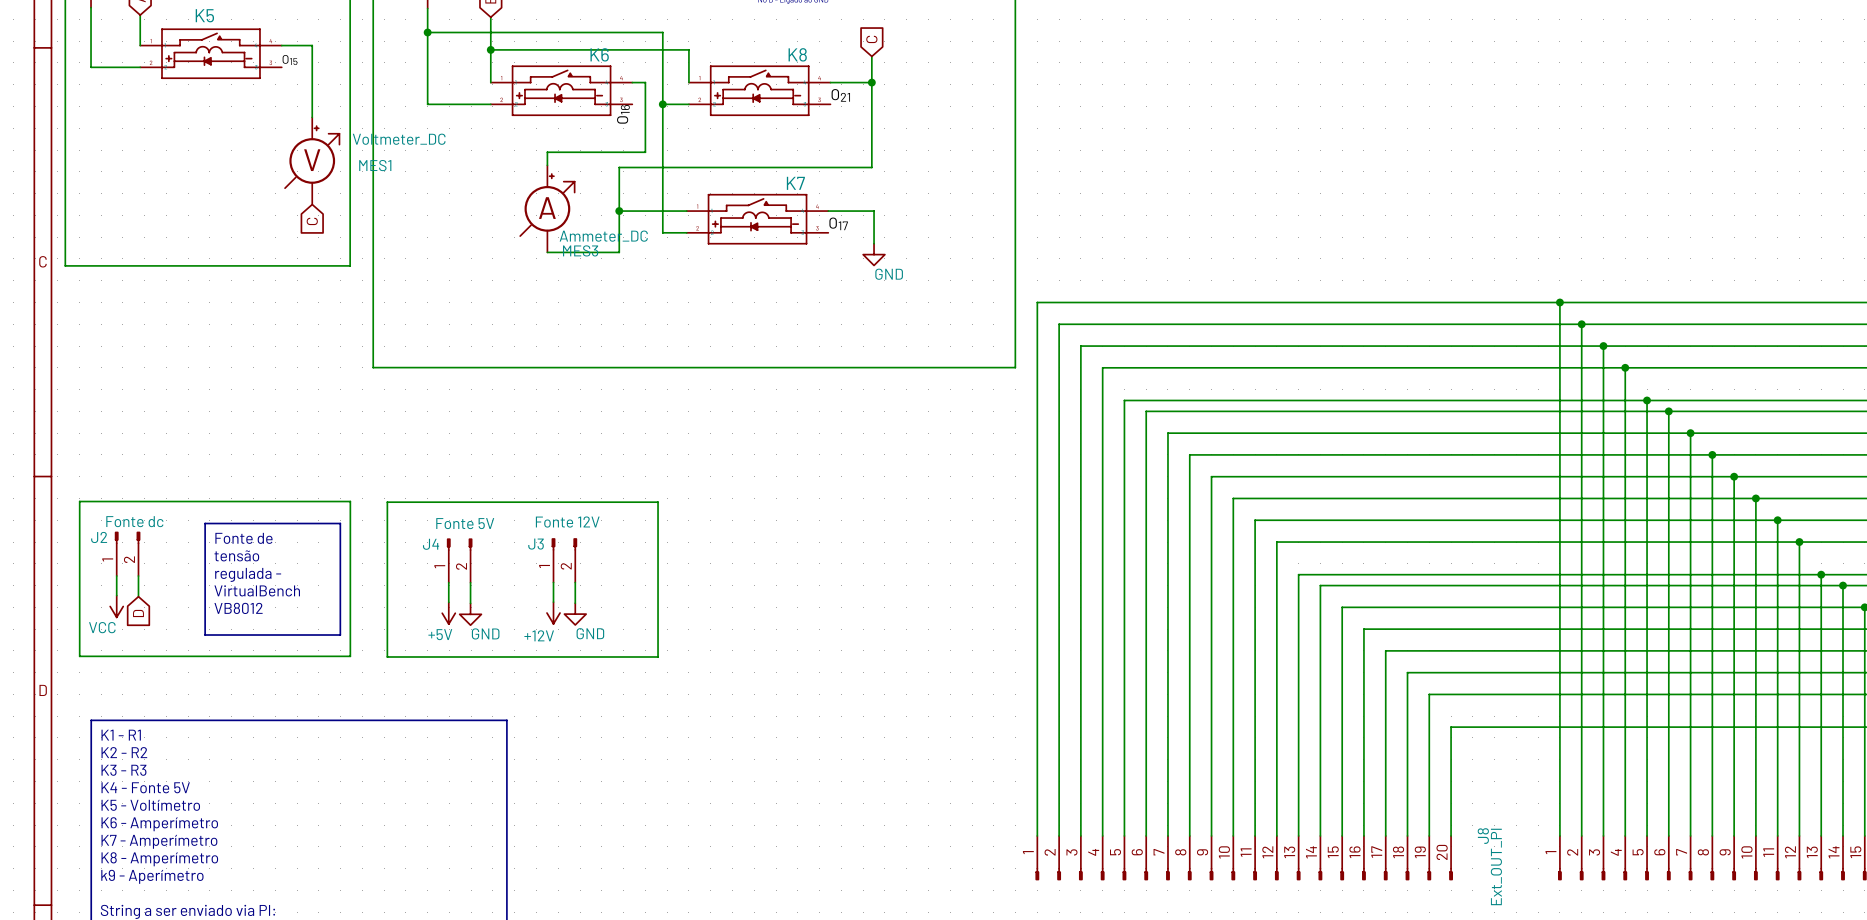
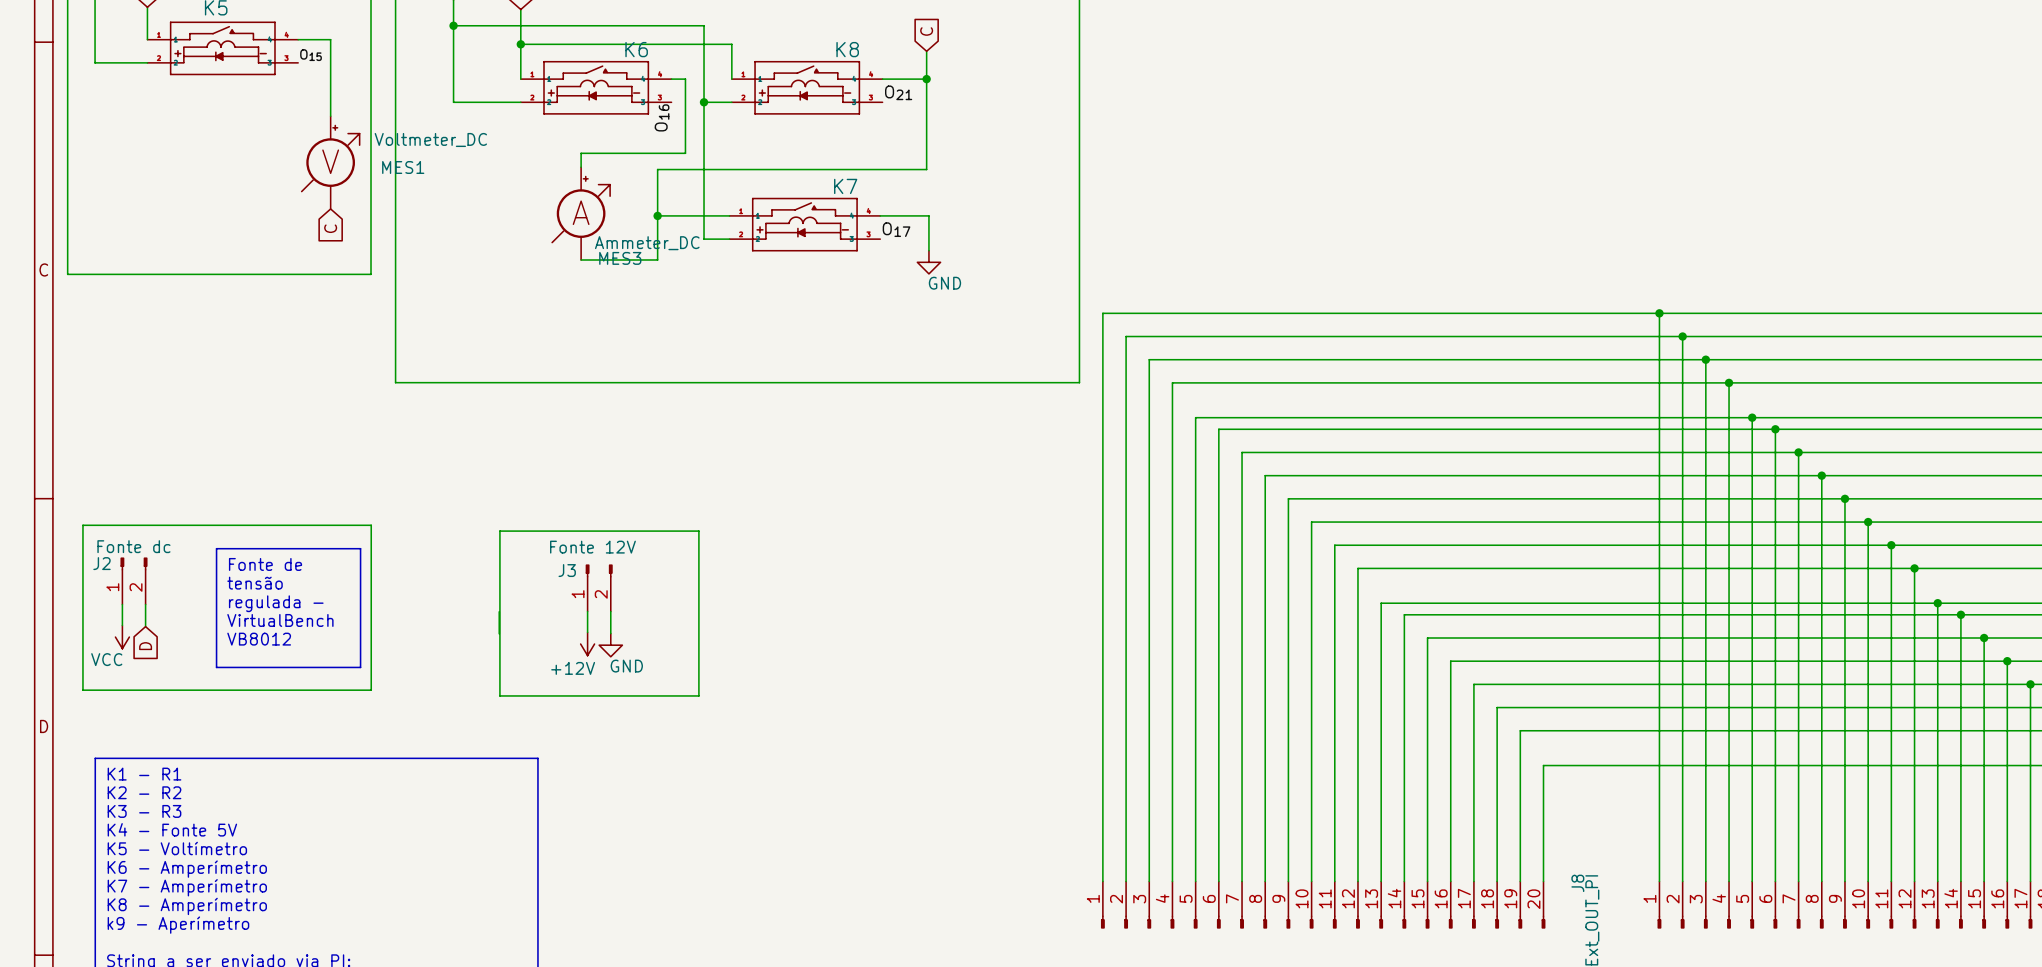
wire: (658, 506) (658, 502) (387, 502) (387, 656) (658, 656) -> (698, 531) (499, 531) (499, 695) (698, 695) (698, 690)
J4: Fonte 5V (459, 560) -> none
wire: (448, 582) (448, 602) -> none
power symbol: +5V (448, 613) -> none
power symbol: GND (470, 614) -> none

